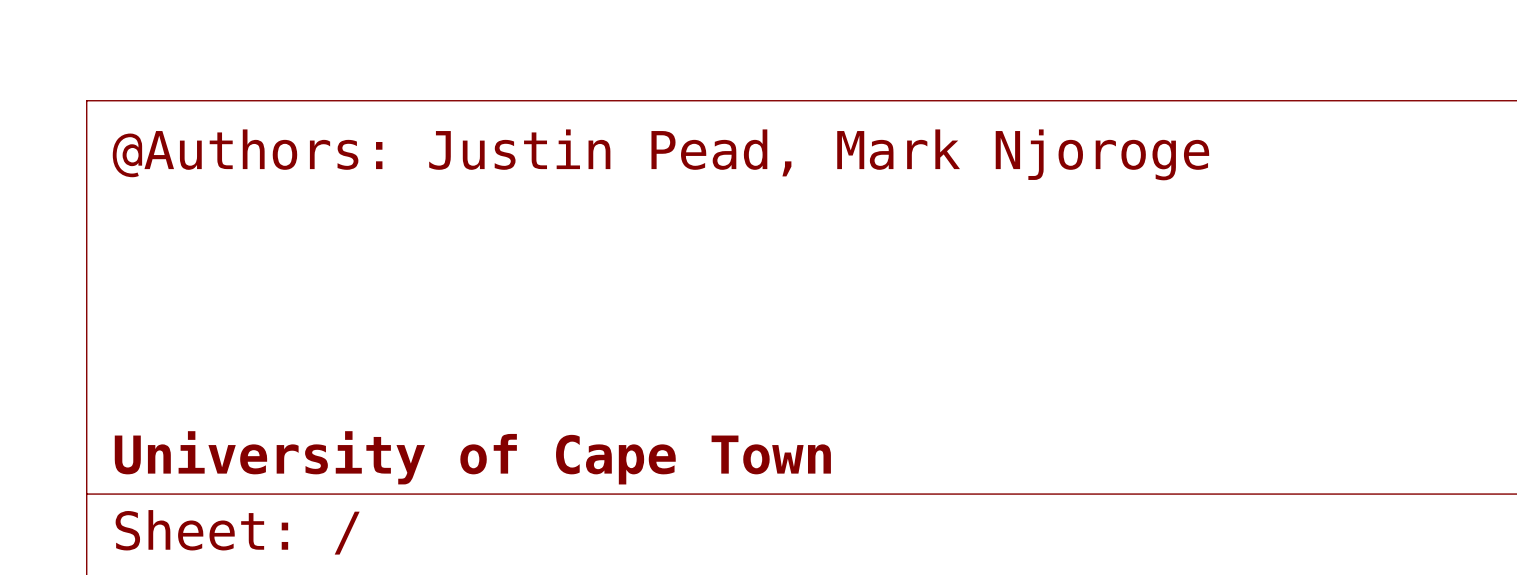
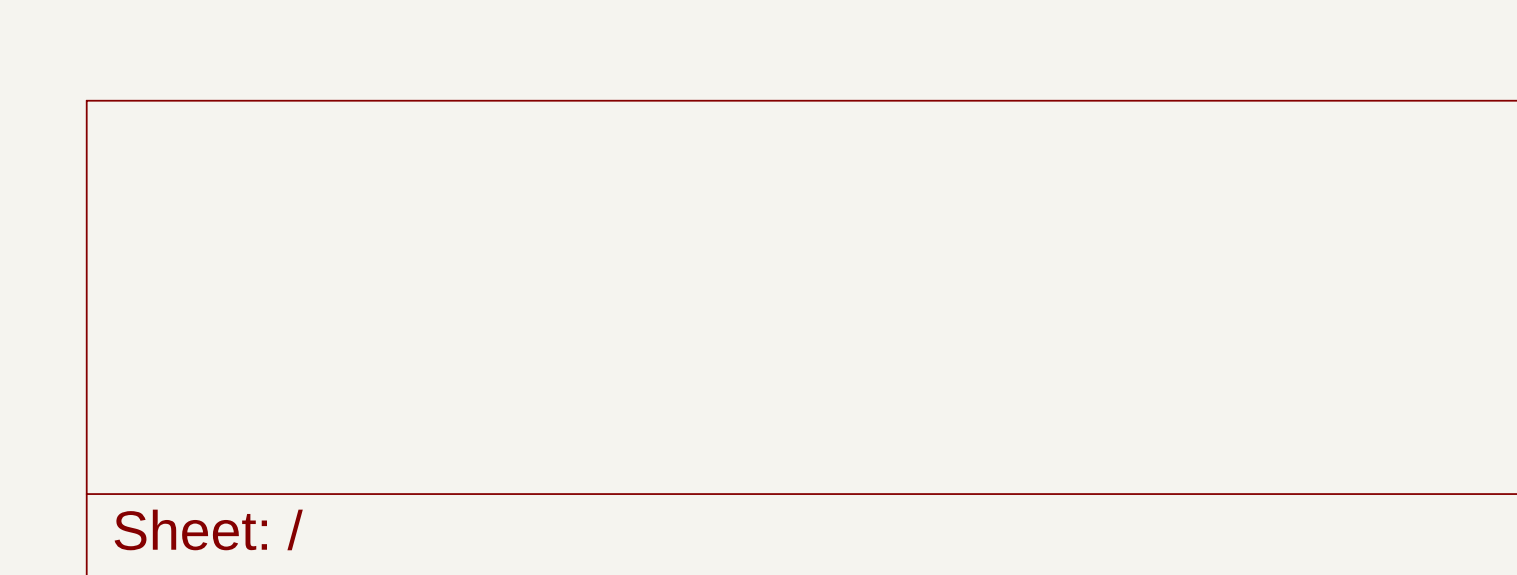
title block: @Authors: Justin Pead, Mark Njoroge (660, 154) -> none
title block: University of Cape Town (472, 457) -> none

